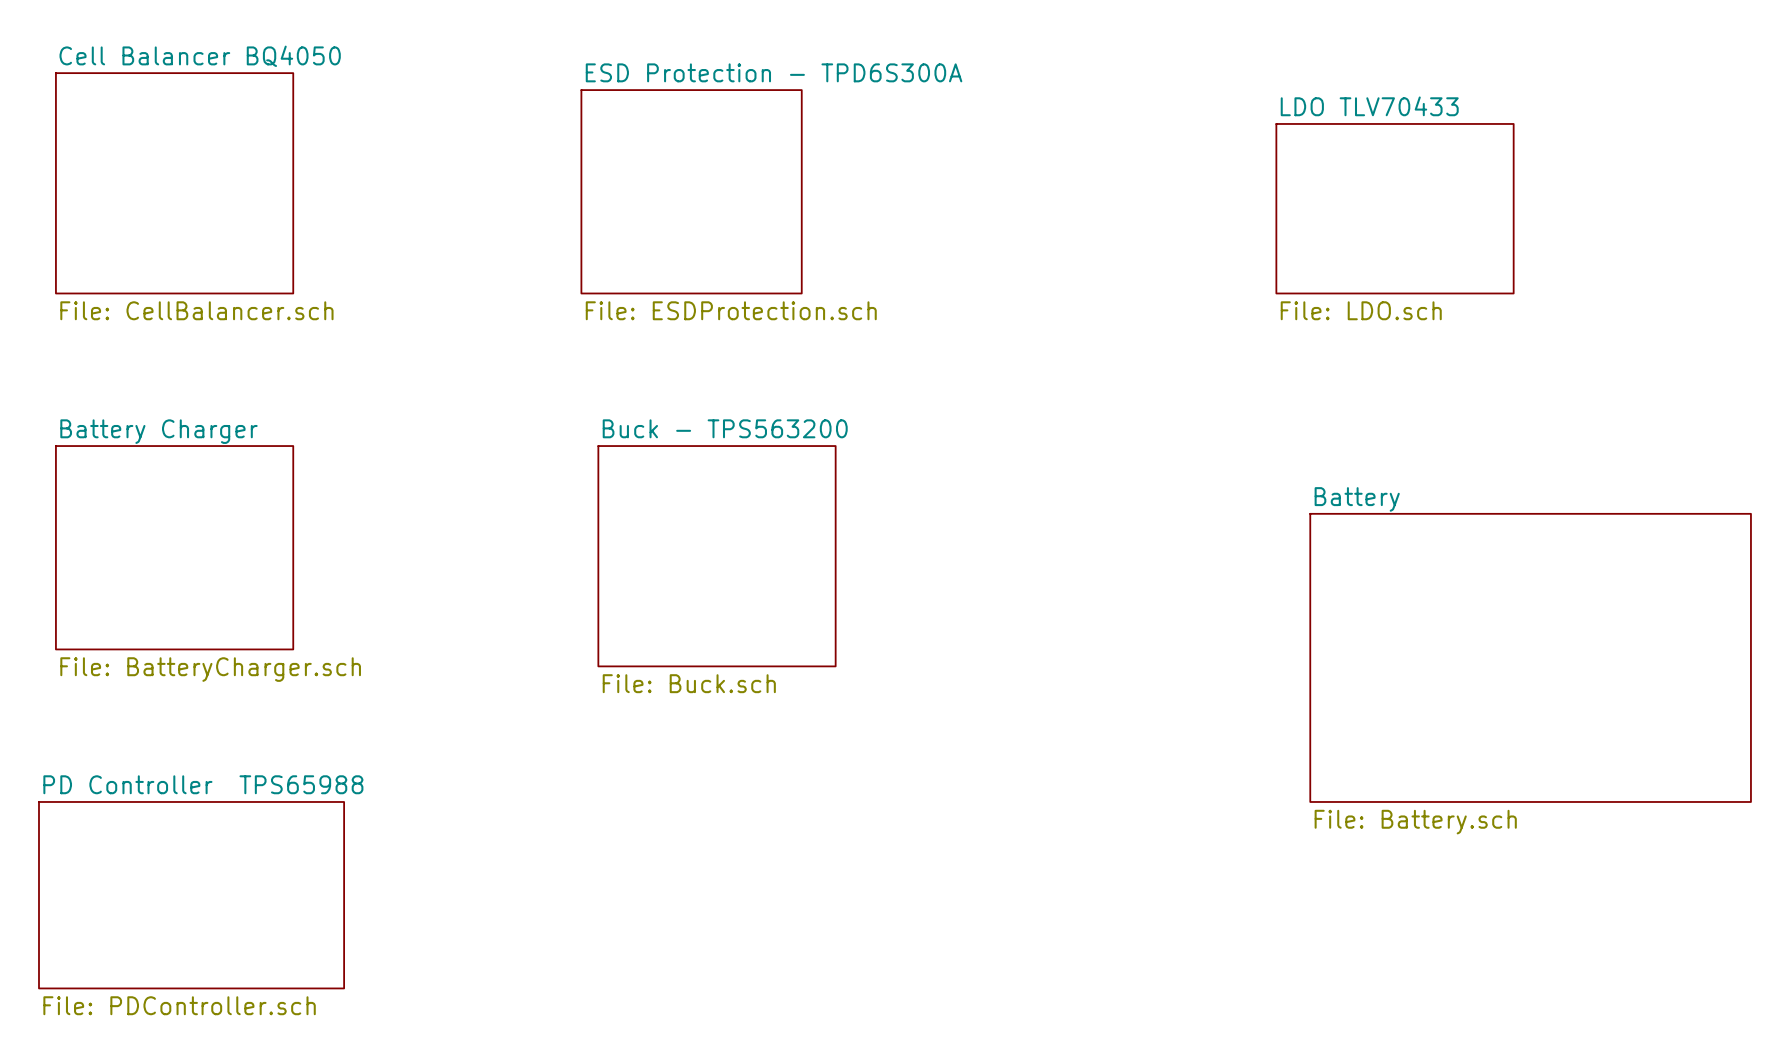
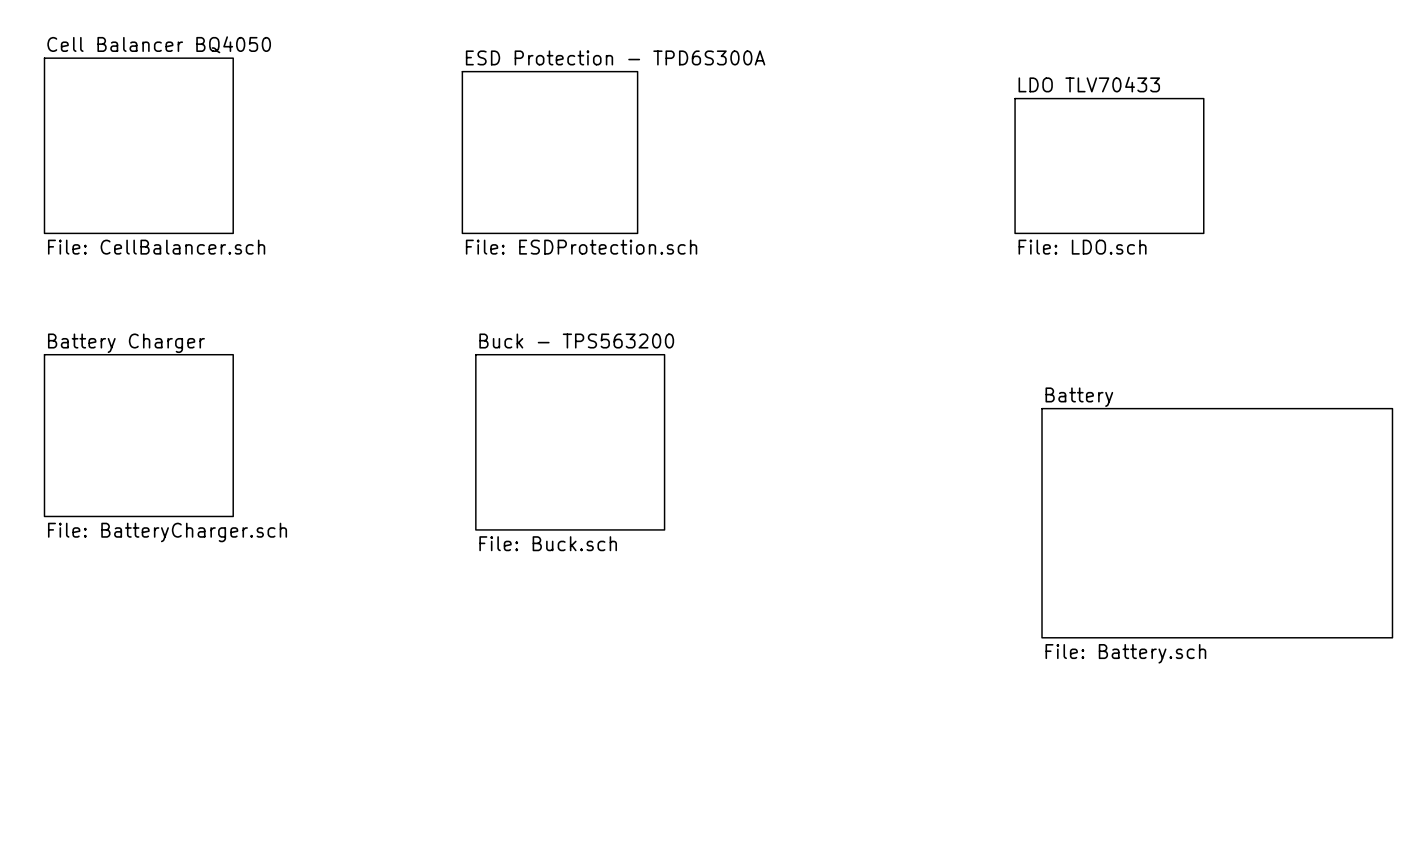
sheet PD Controller TPS65988: File: PDController.sch (191, 895) -> none

